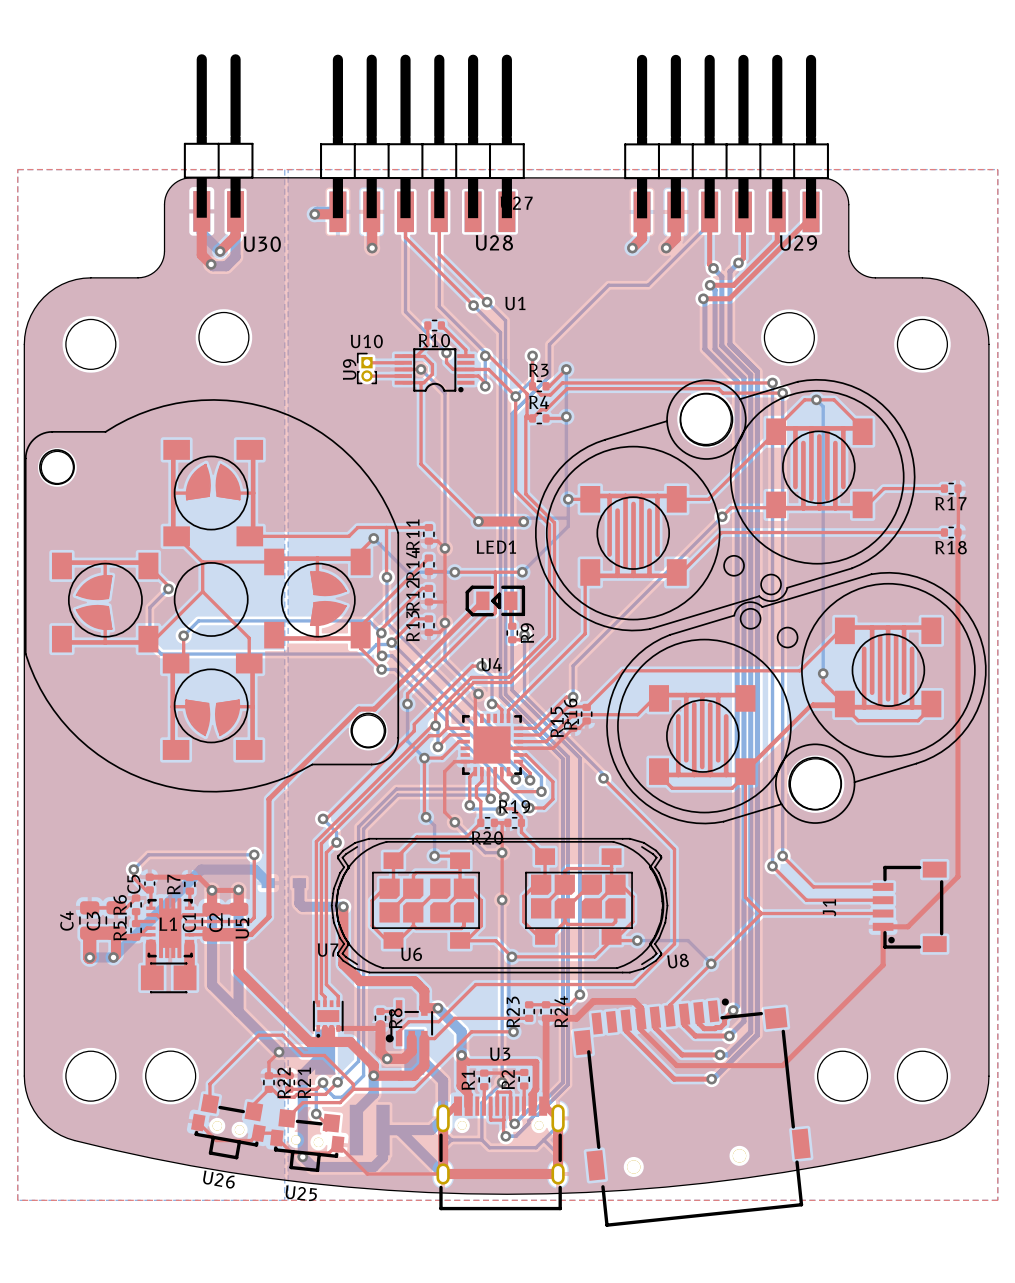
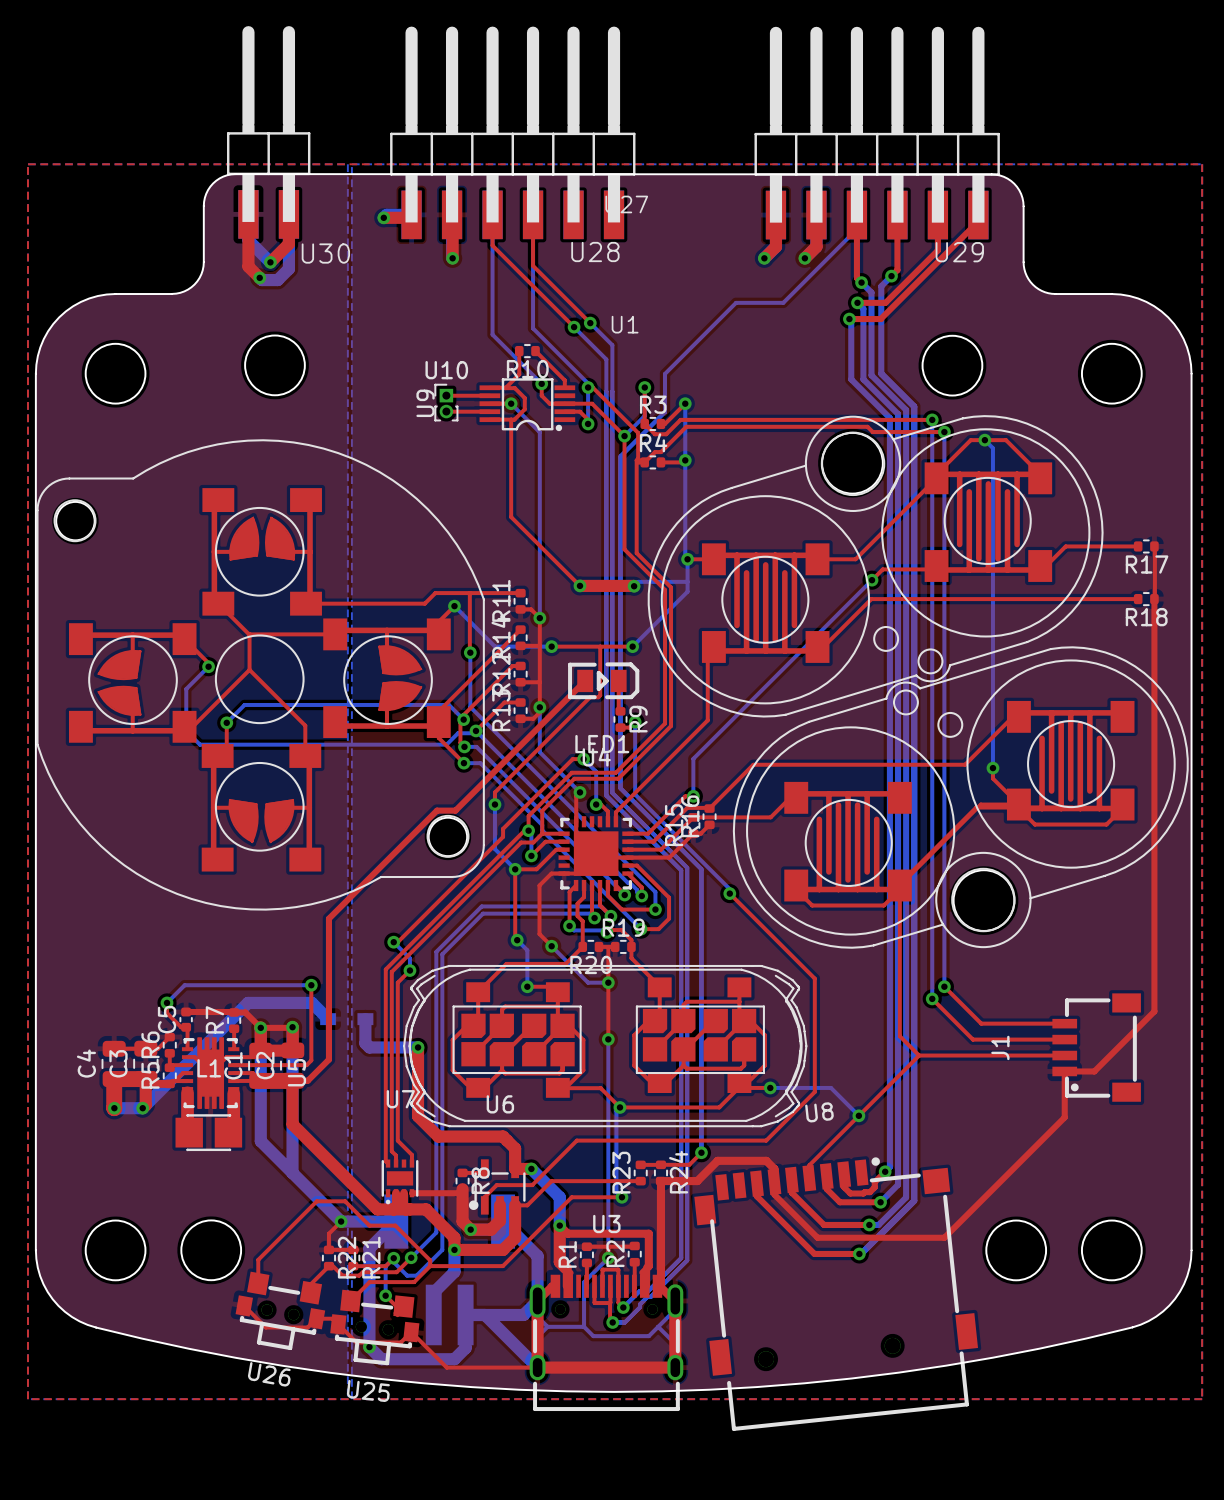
LED1 rotation: 0° (495, 600) -> 180° (603, 680)

